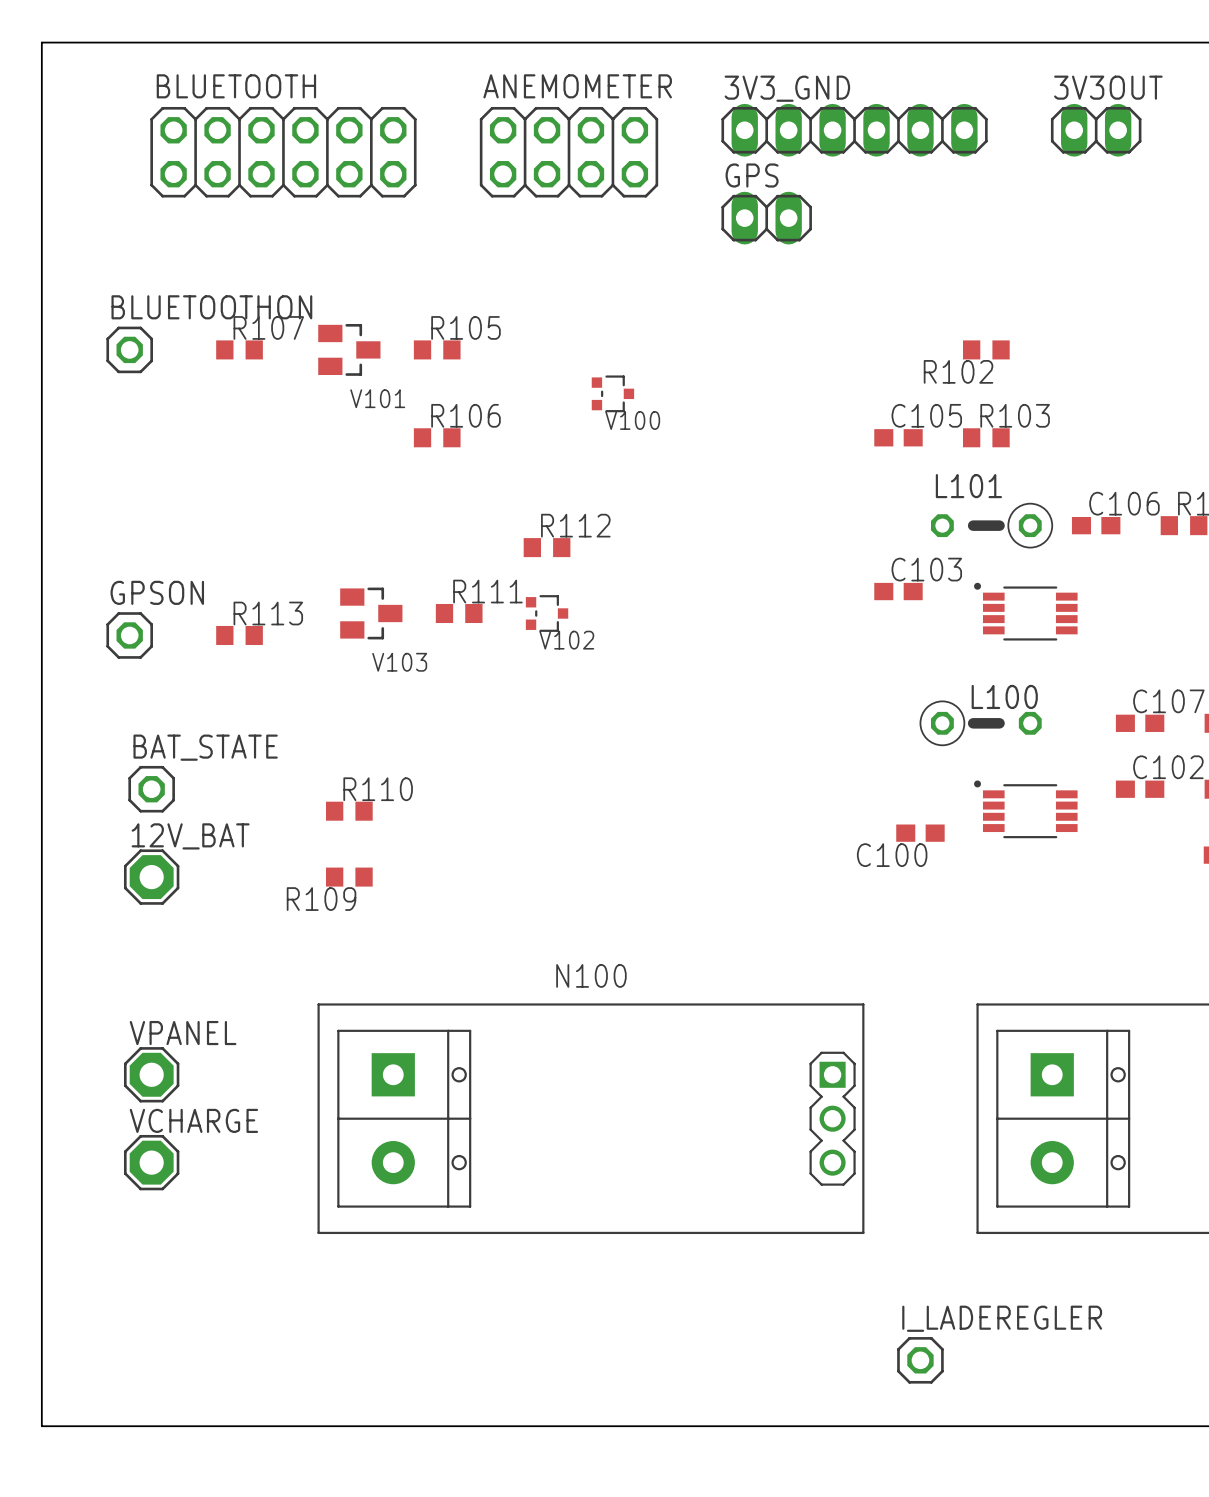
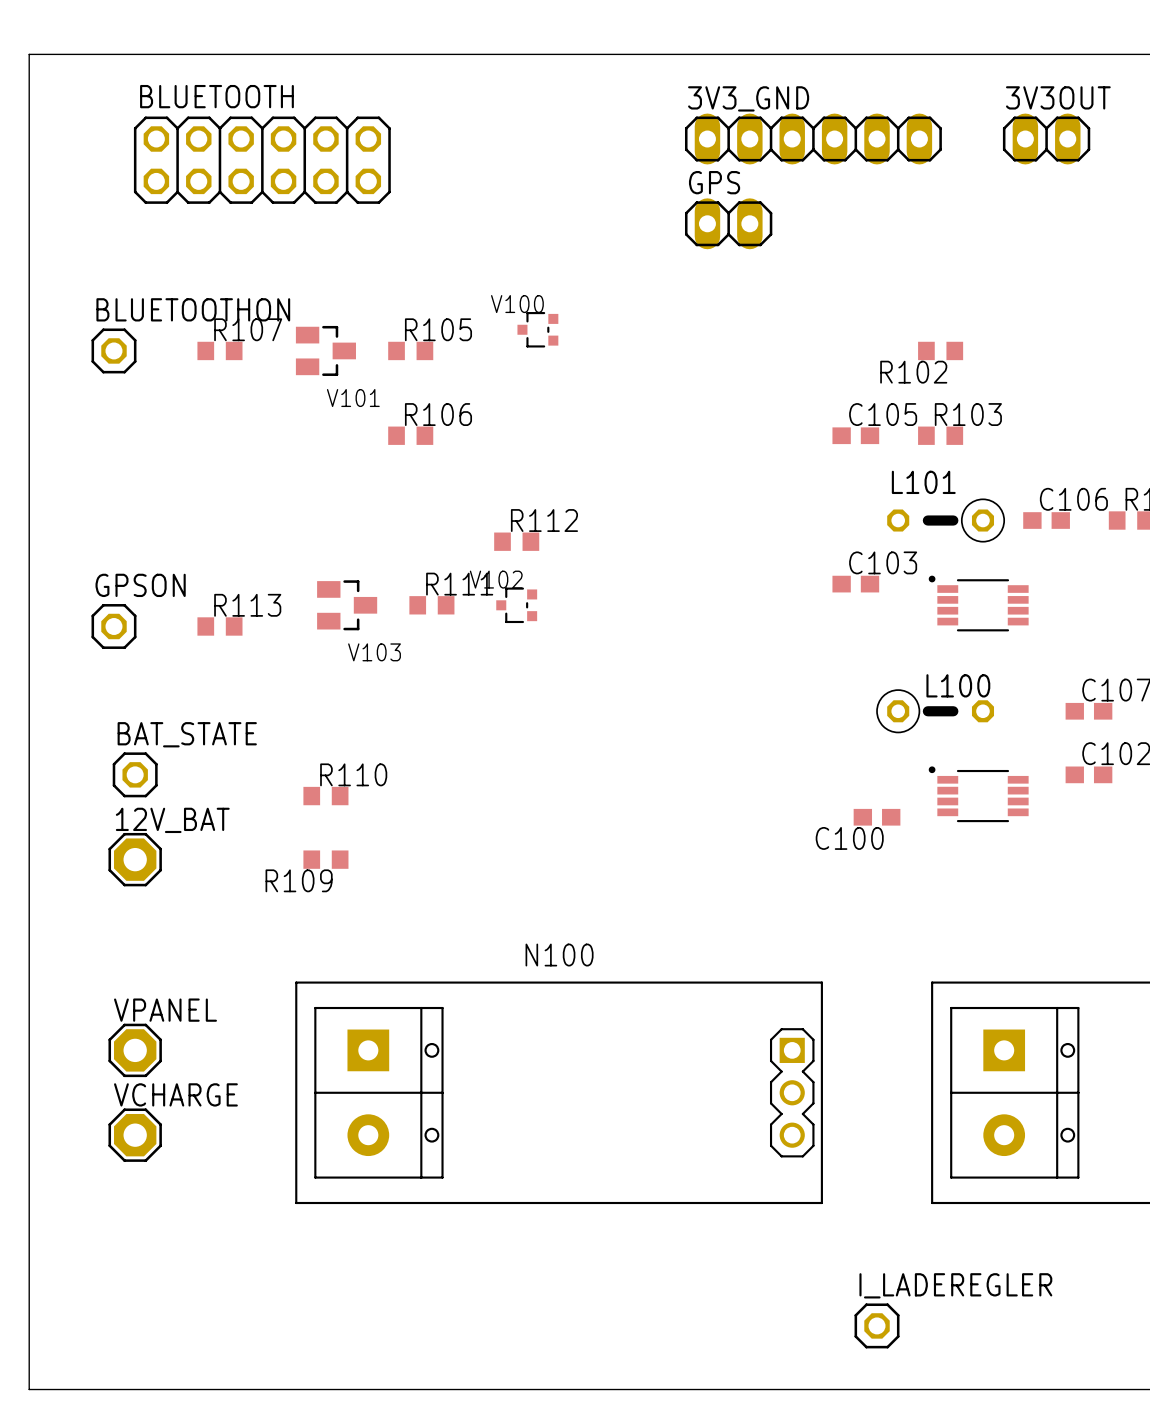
ANEMOMETER: (569, 152) -> none
V100 rotation: 0° (612, 393) -> 180° (537, 329)
V100 position: (612, 393) -> (537, 329)
V102 rotation: 0° (547, 613) -> 180° (516, 605)

